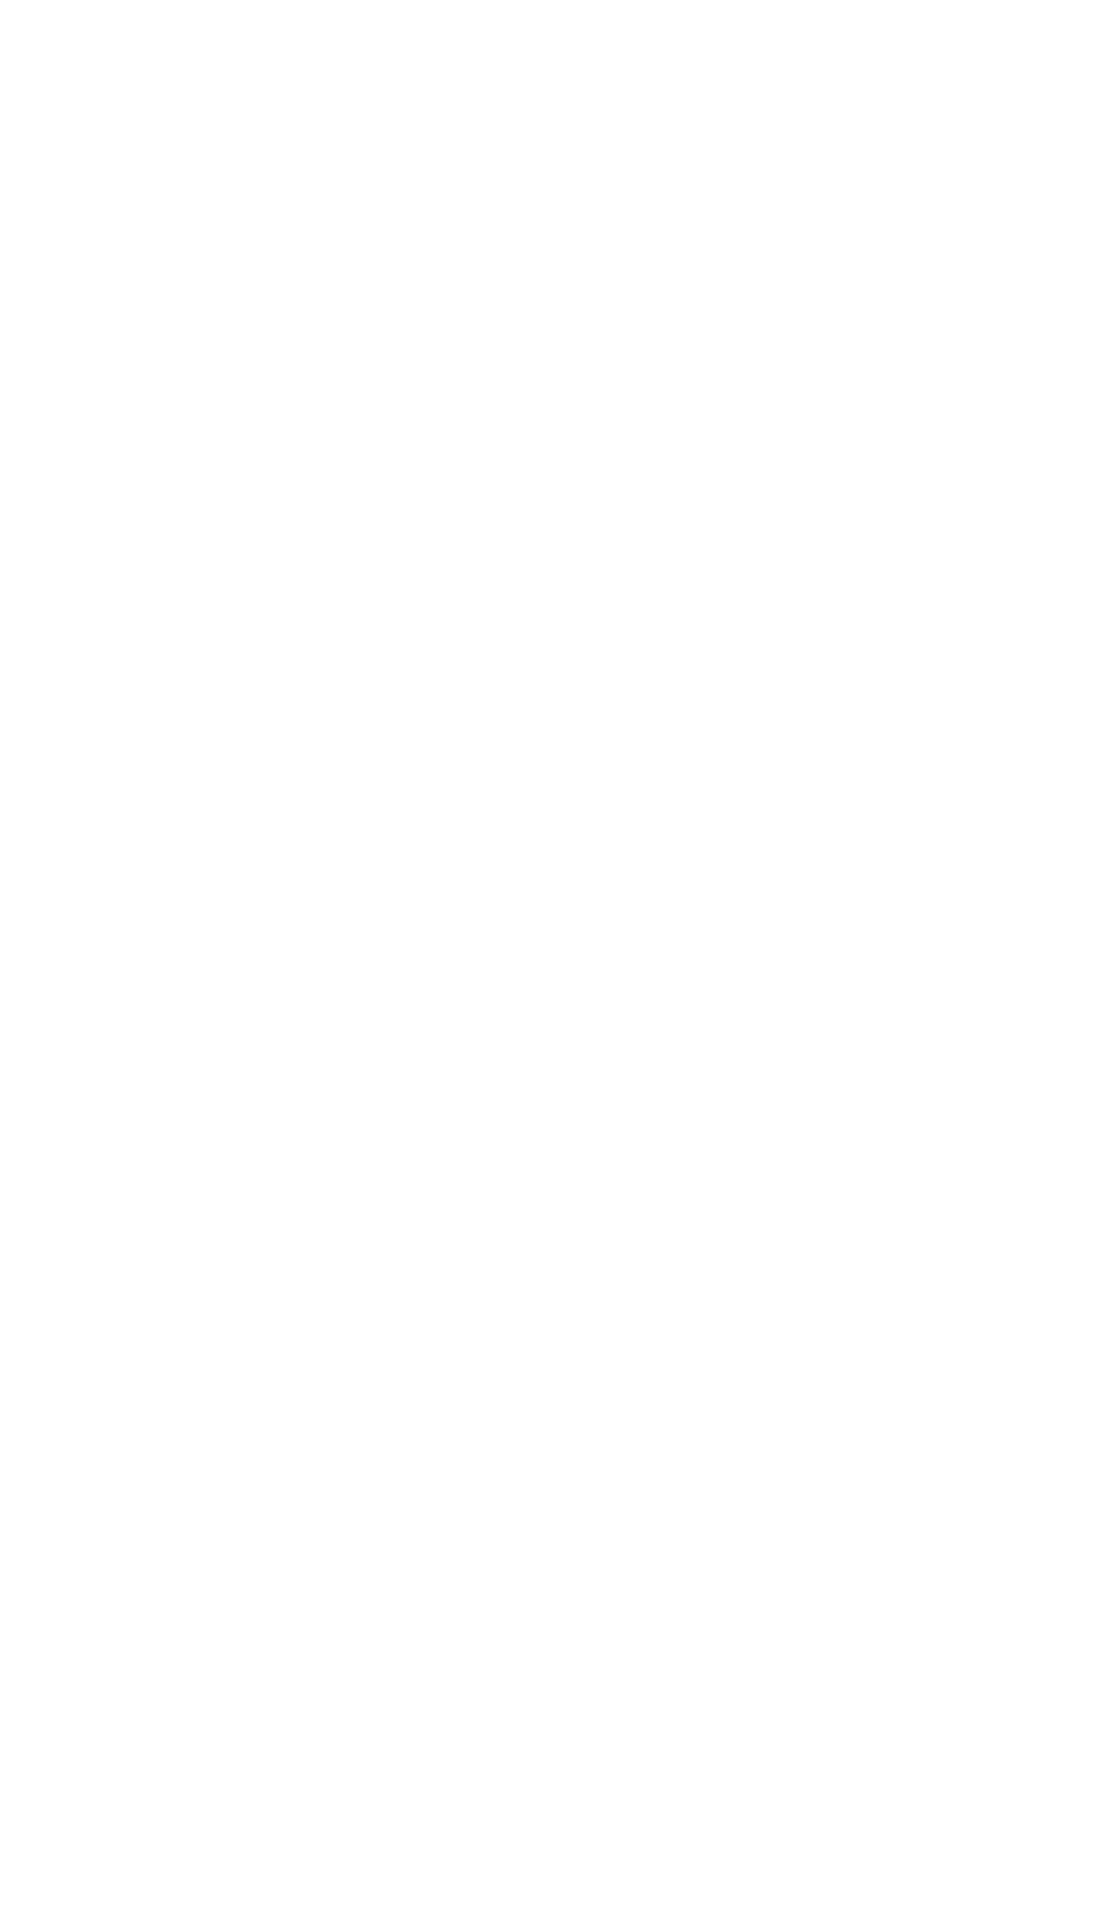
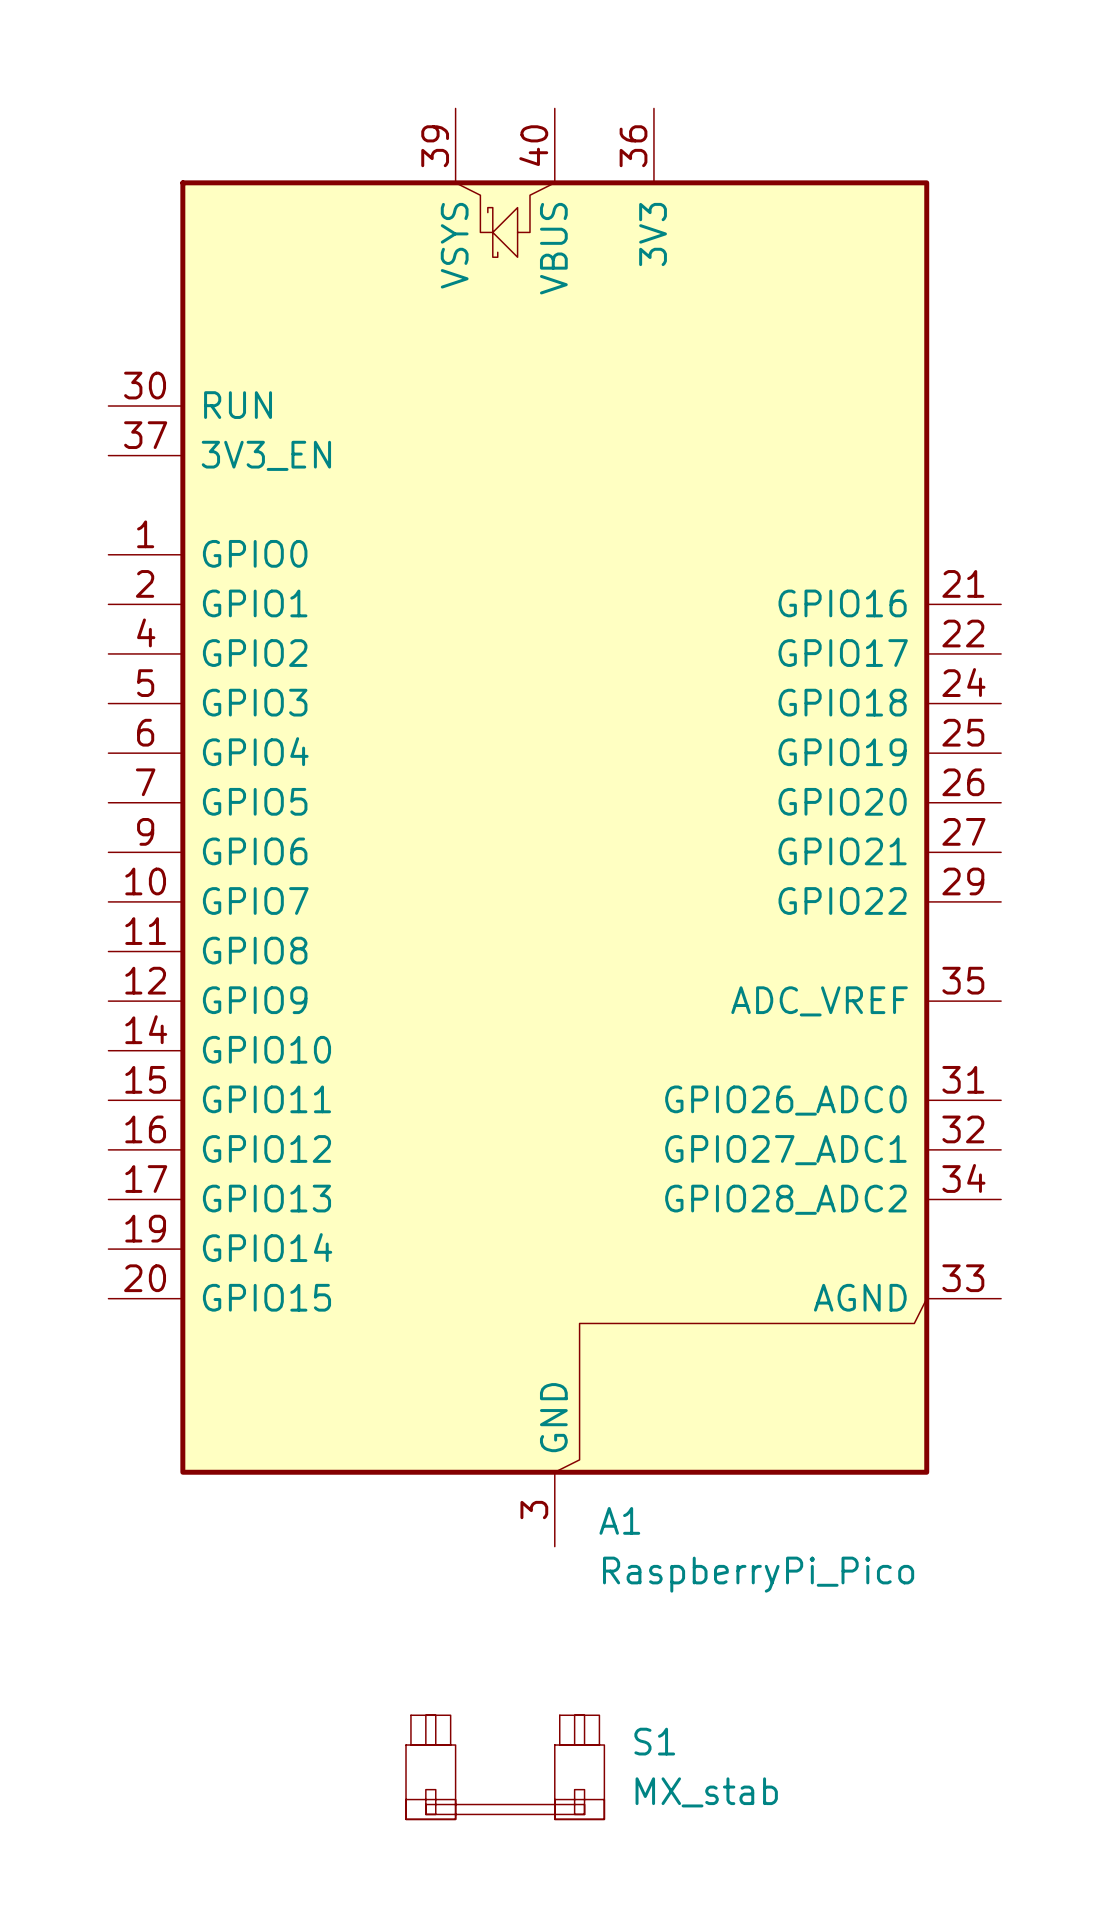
A1: none -> RaspberryPi_Pico (554, 827)
S1: none -> MX_stab (505, 1767)

